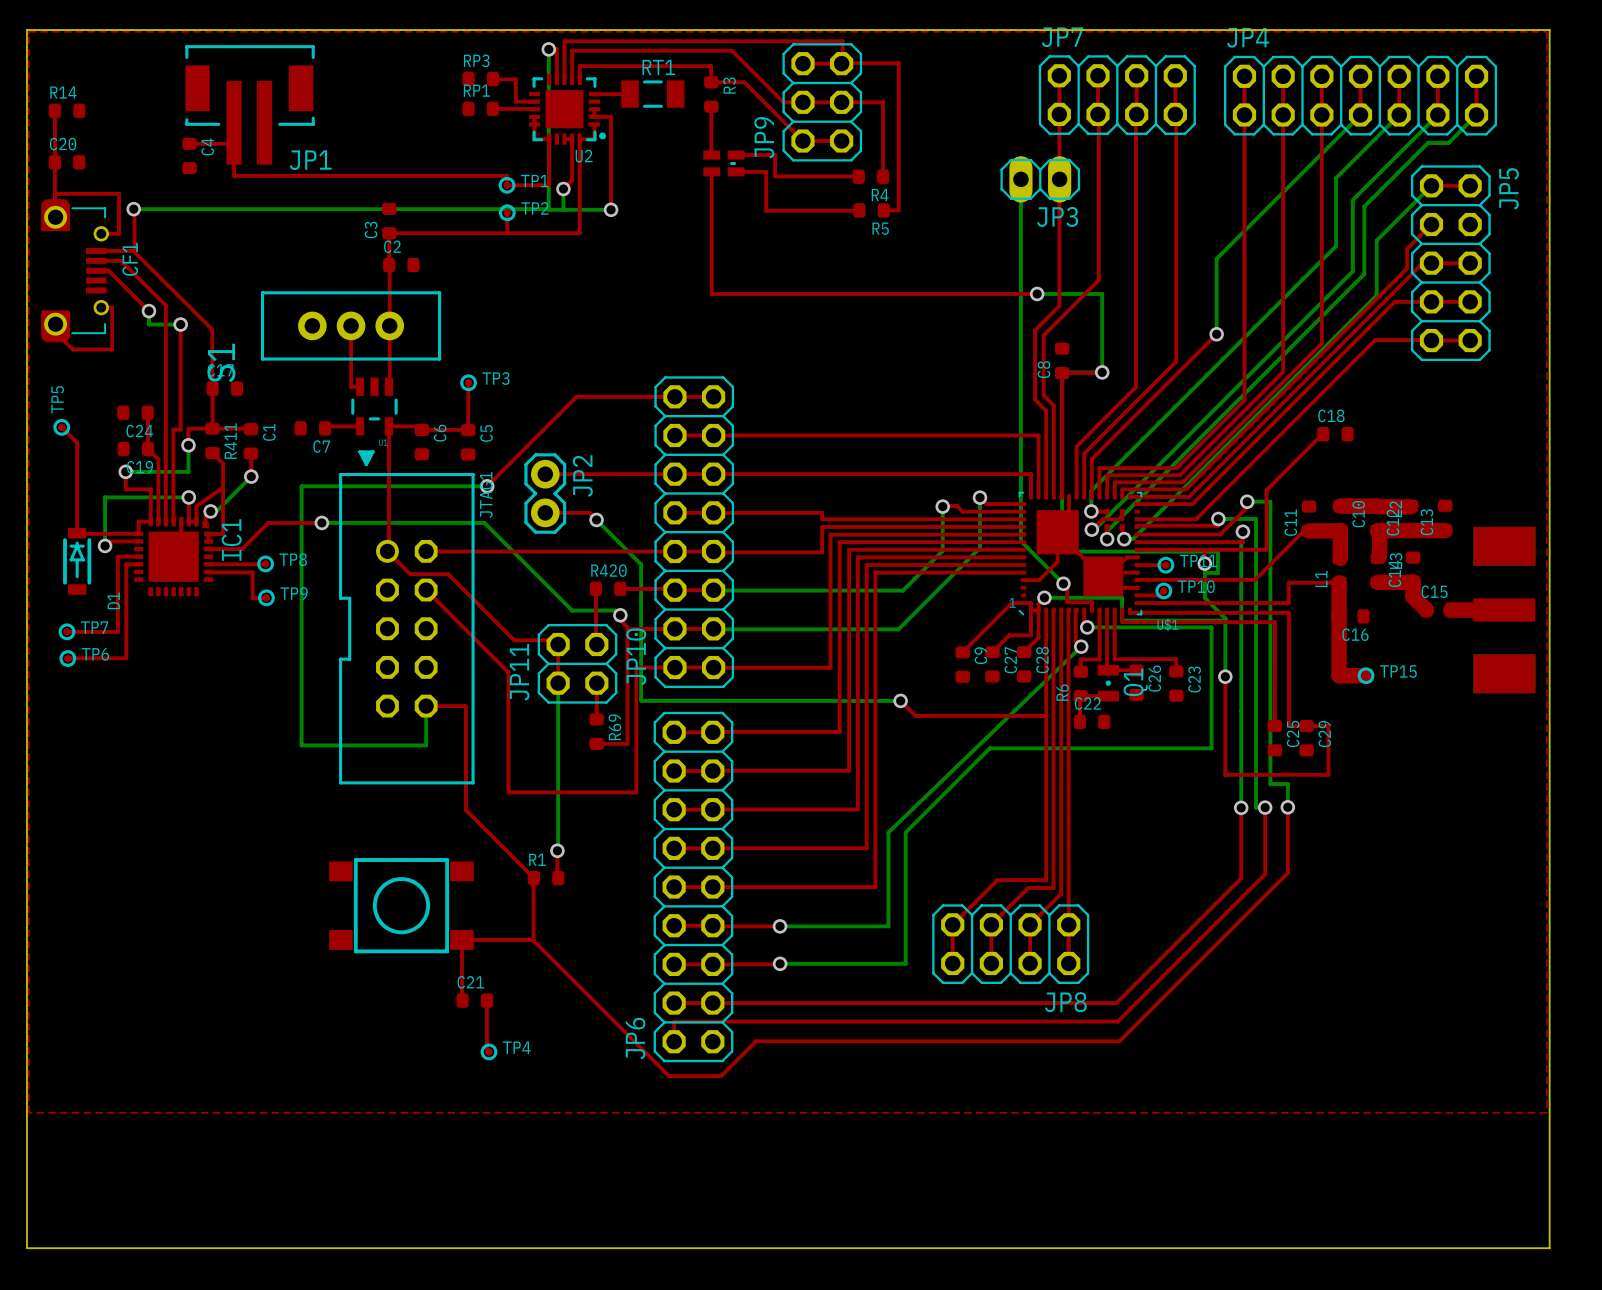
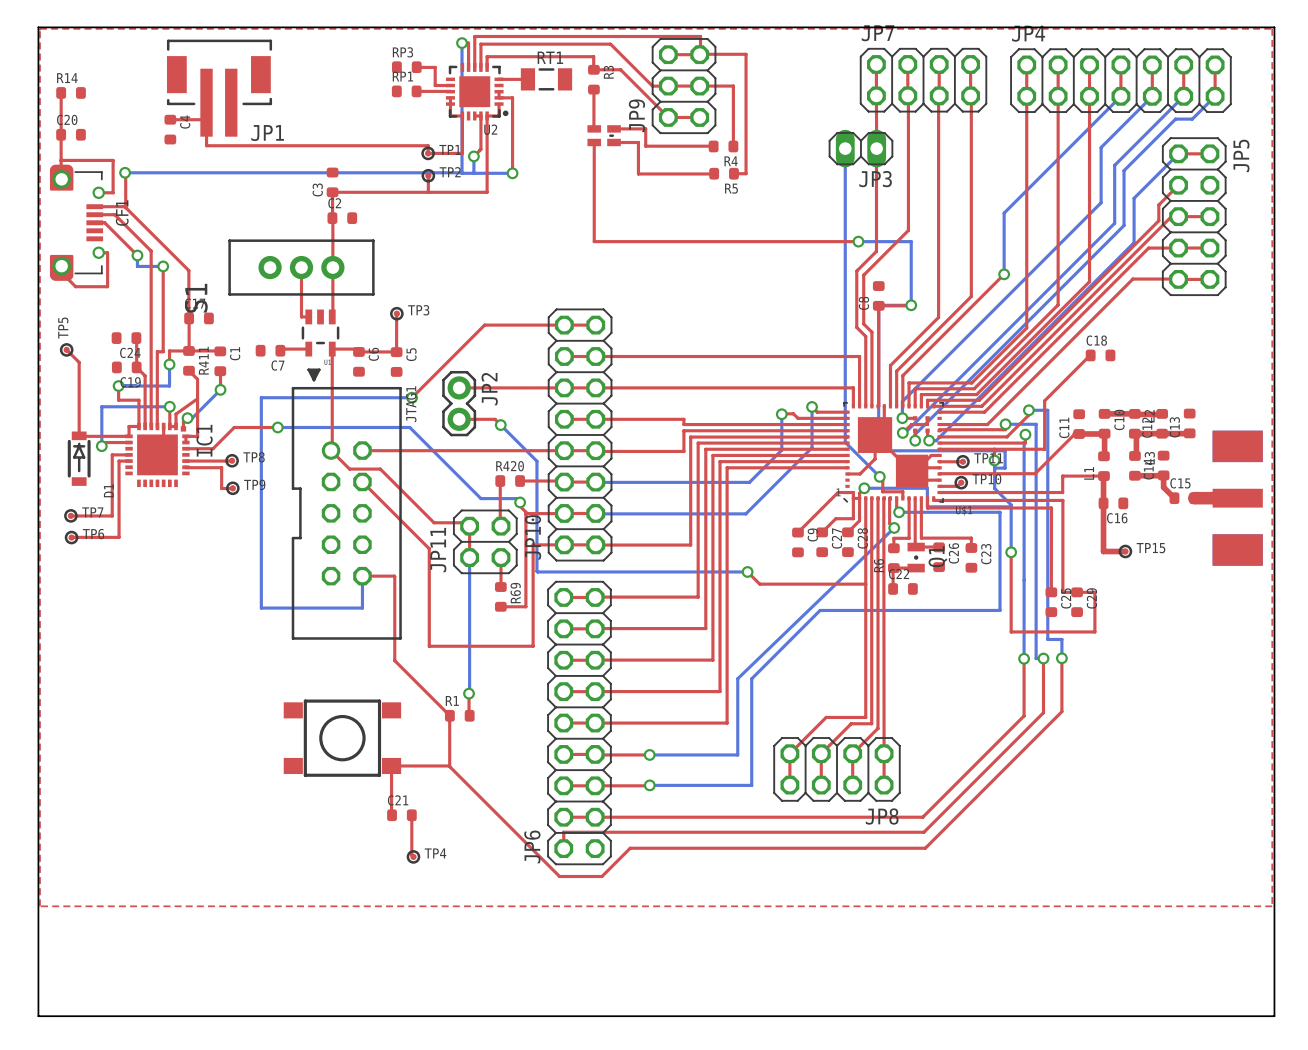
top track width: thick (1340, 506) (1377, 506) -> thin (1104, 413) (1134, 413)
top track width: thick (1379, 506) (1410, 506) -> thin (1136, 414) (1161, 414)
top track width: thick (1309, 530) (1340, 530) -> thin (1079, 433) (1104, 433)
top track width: thick (1340, 530) (1340, 558) -> thin (1104, 433) (1104, 456)
top track width: thick (1377, 530) (1444, 530) -> thin (1134, 433) (1189, 433)
top track width: thick (1379, 531) (1379, 556) -> thin (1136, 434) (1136, 454)
top track width: thick (1413, 581) (1413, 596) (1426, 610) -> thin (1163, 475) (1163, 487) (1174, 498)
top track width: thick (1339, 582) (1339, 675) (1366, 675) -> thin (1103, 476) (1103, 551) (1125, 551)
top track width: thick (1377, 582) (1412, 582) -> thin (1134, 475) (1163, 475)

